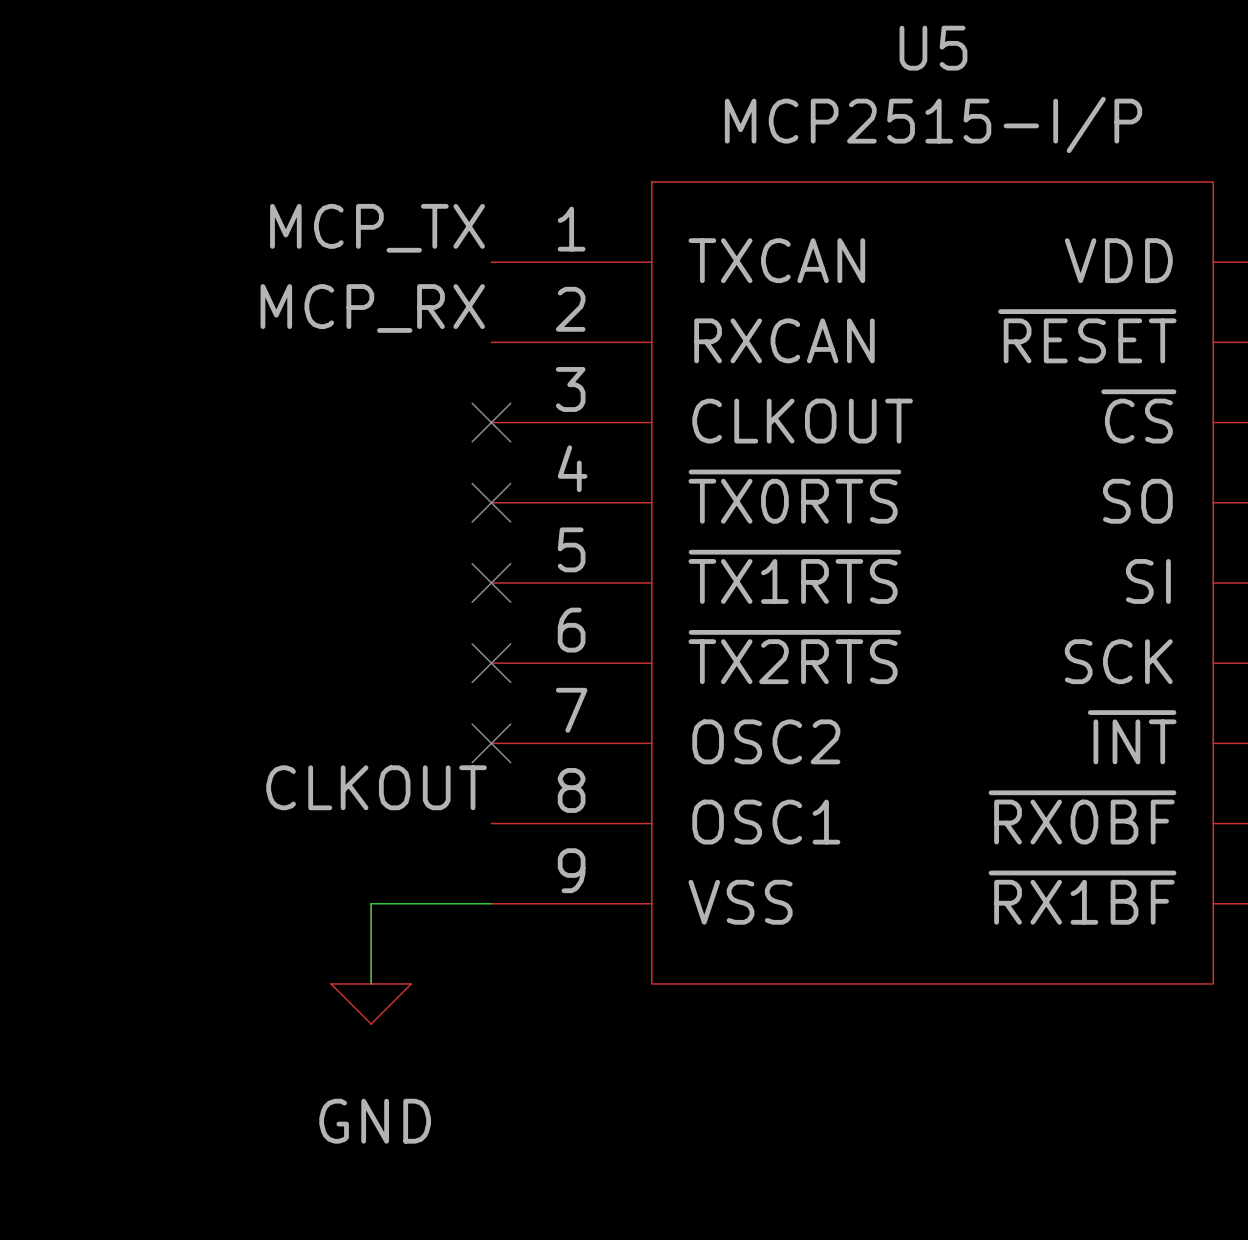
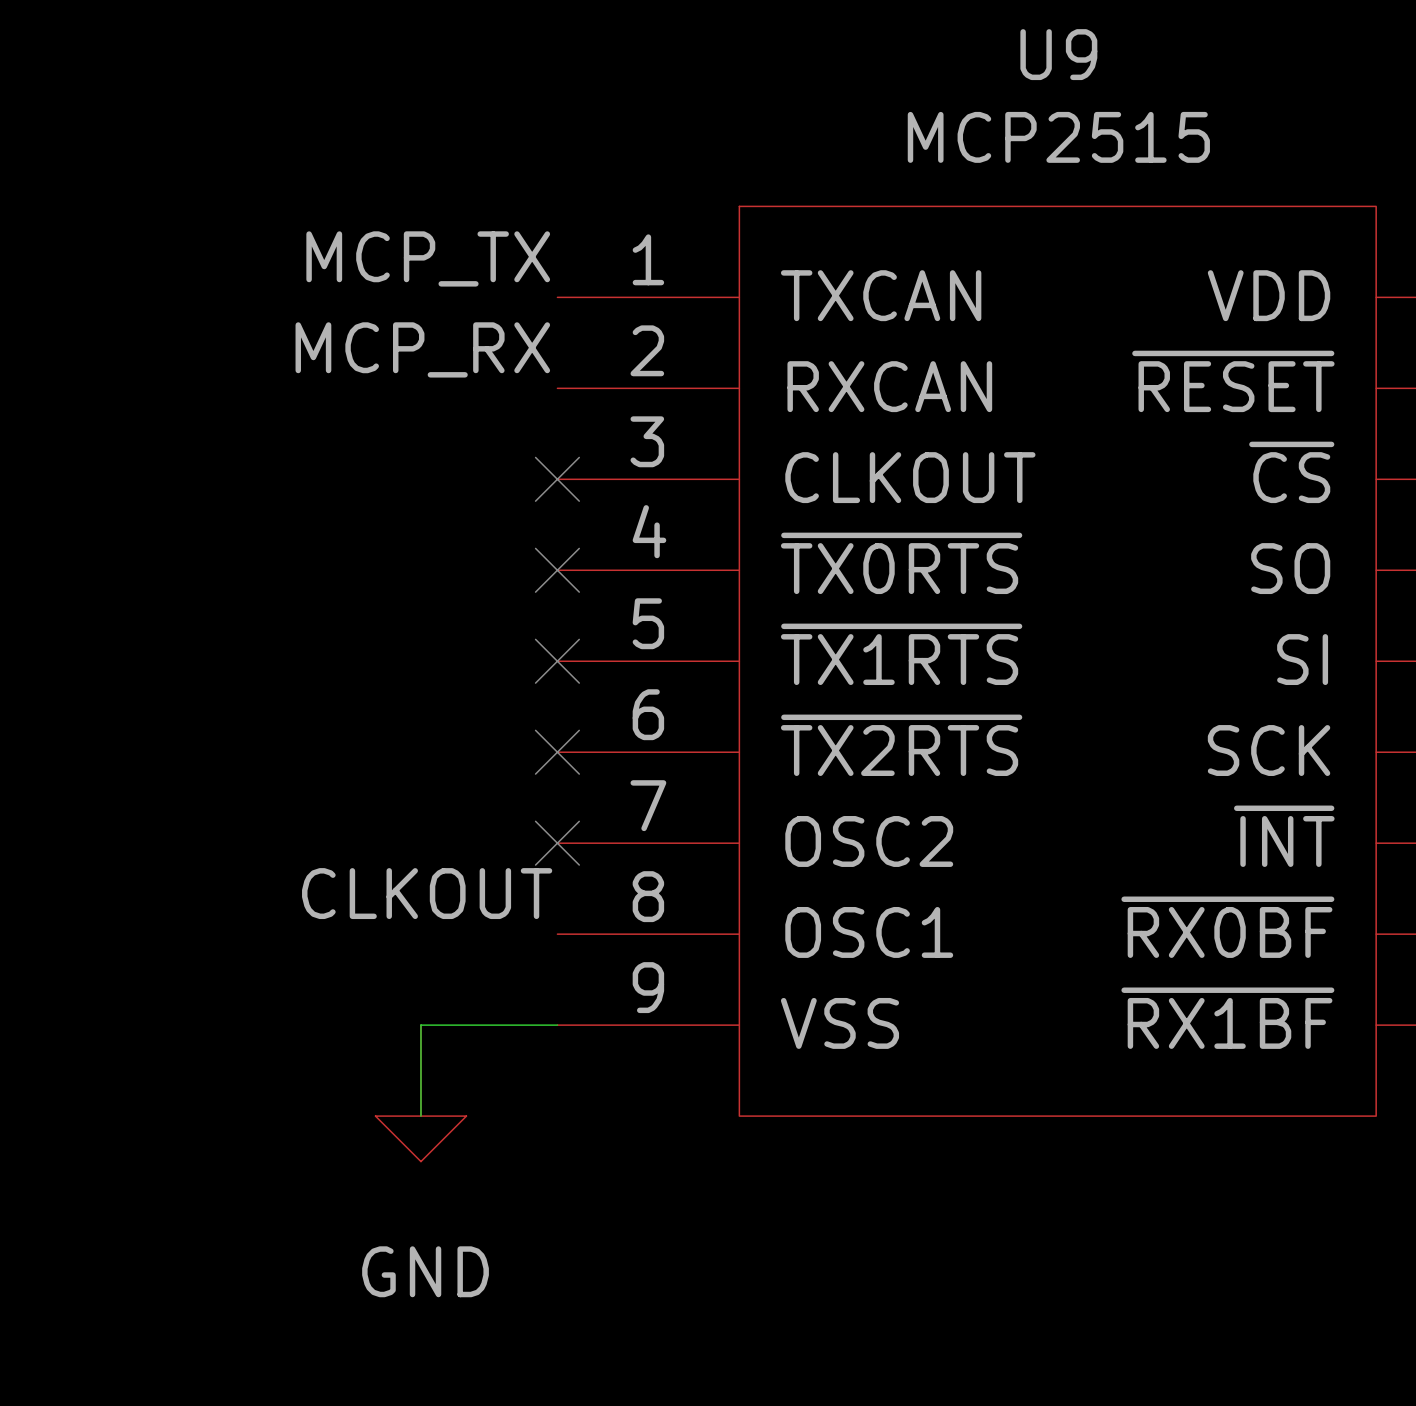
U5 name: U5 (933, 48) -> U9 (1058, 54)
U5 value: MCP2515-I/P (933, 124) -> MCP2515 (1058, 137)

